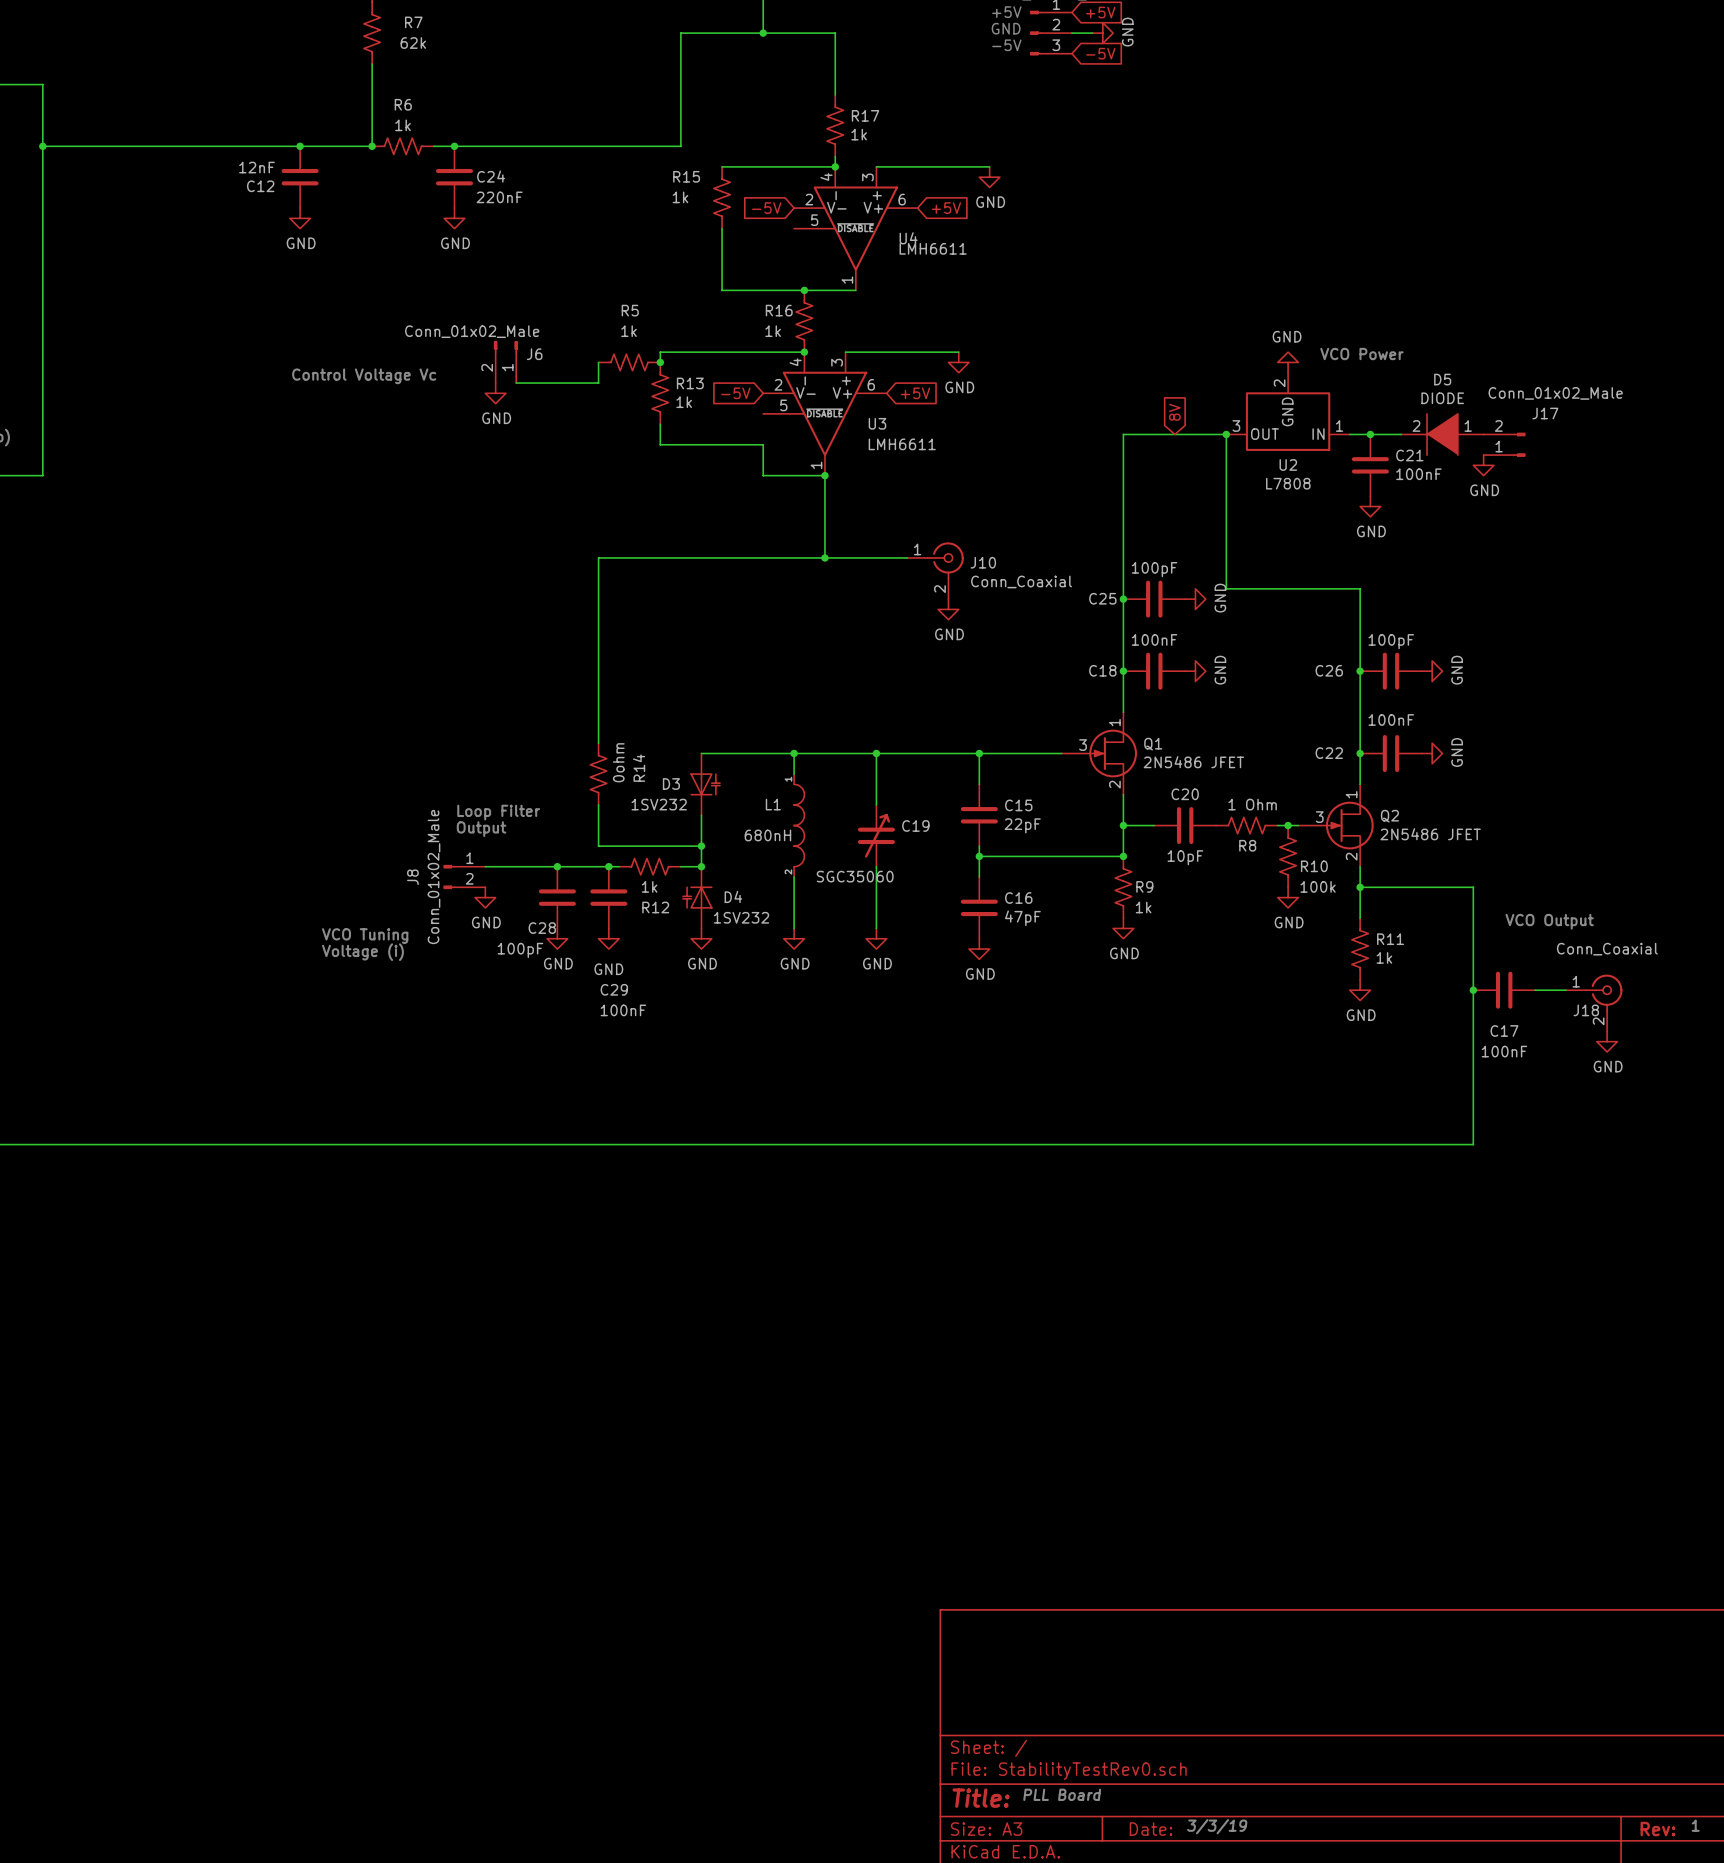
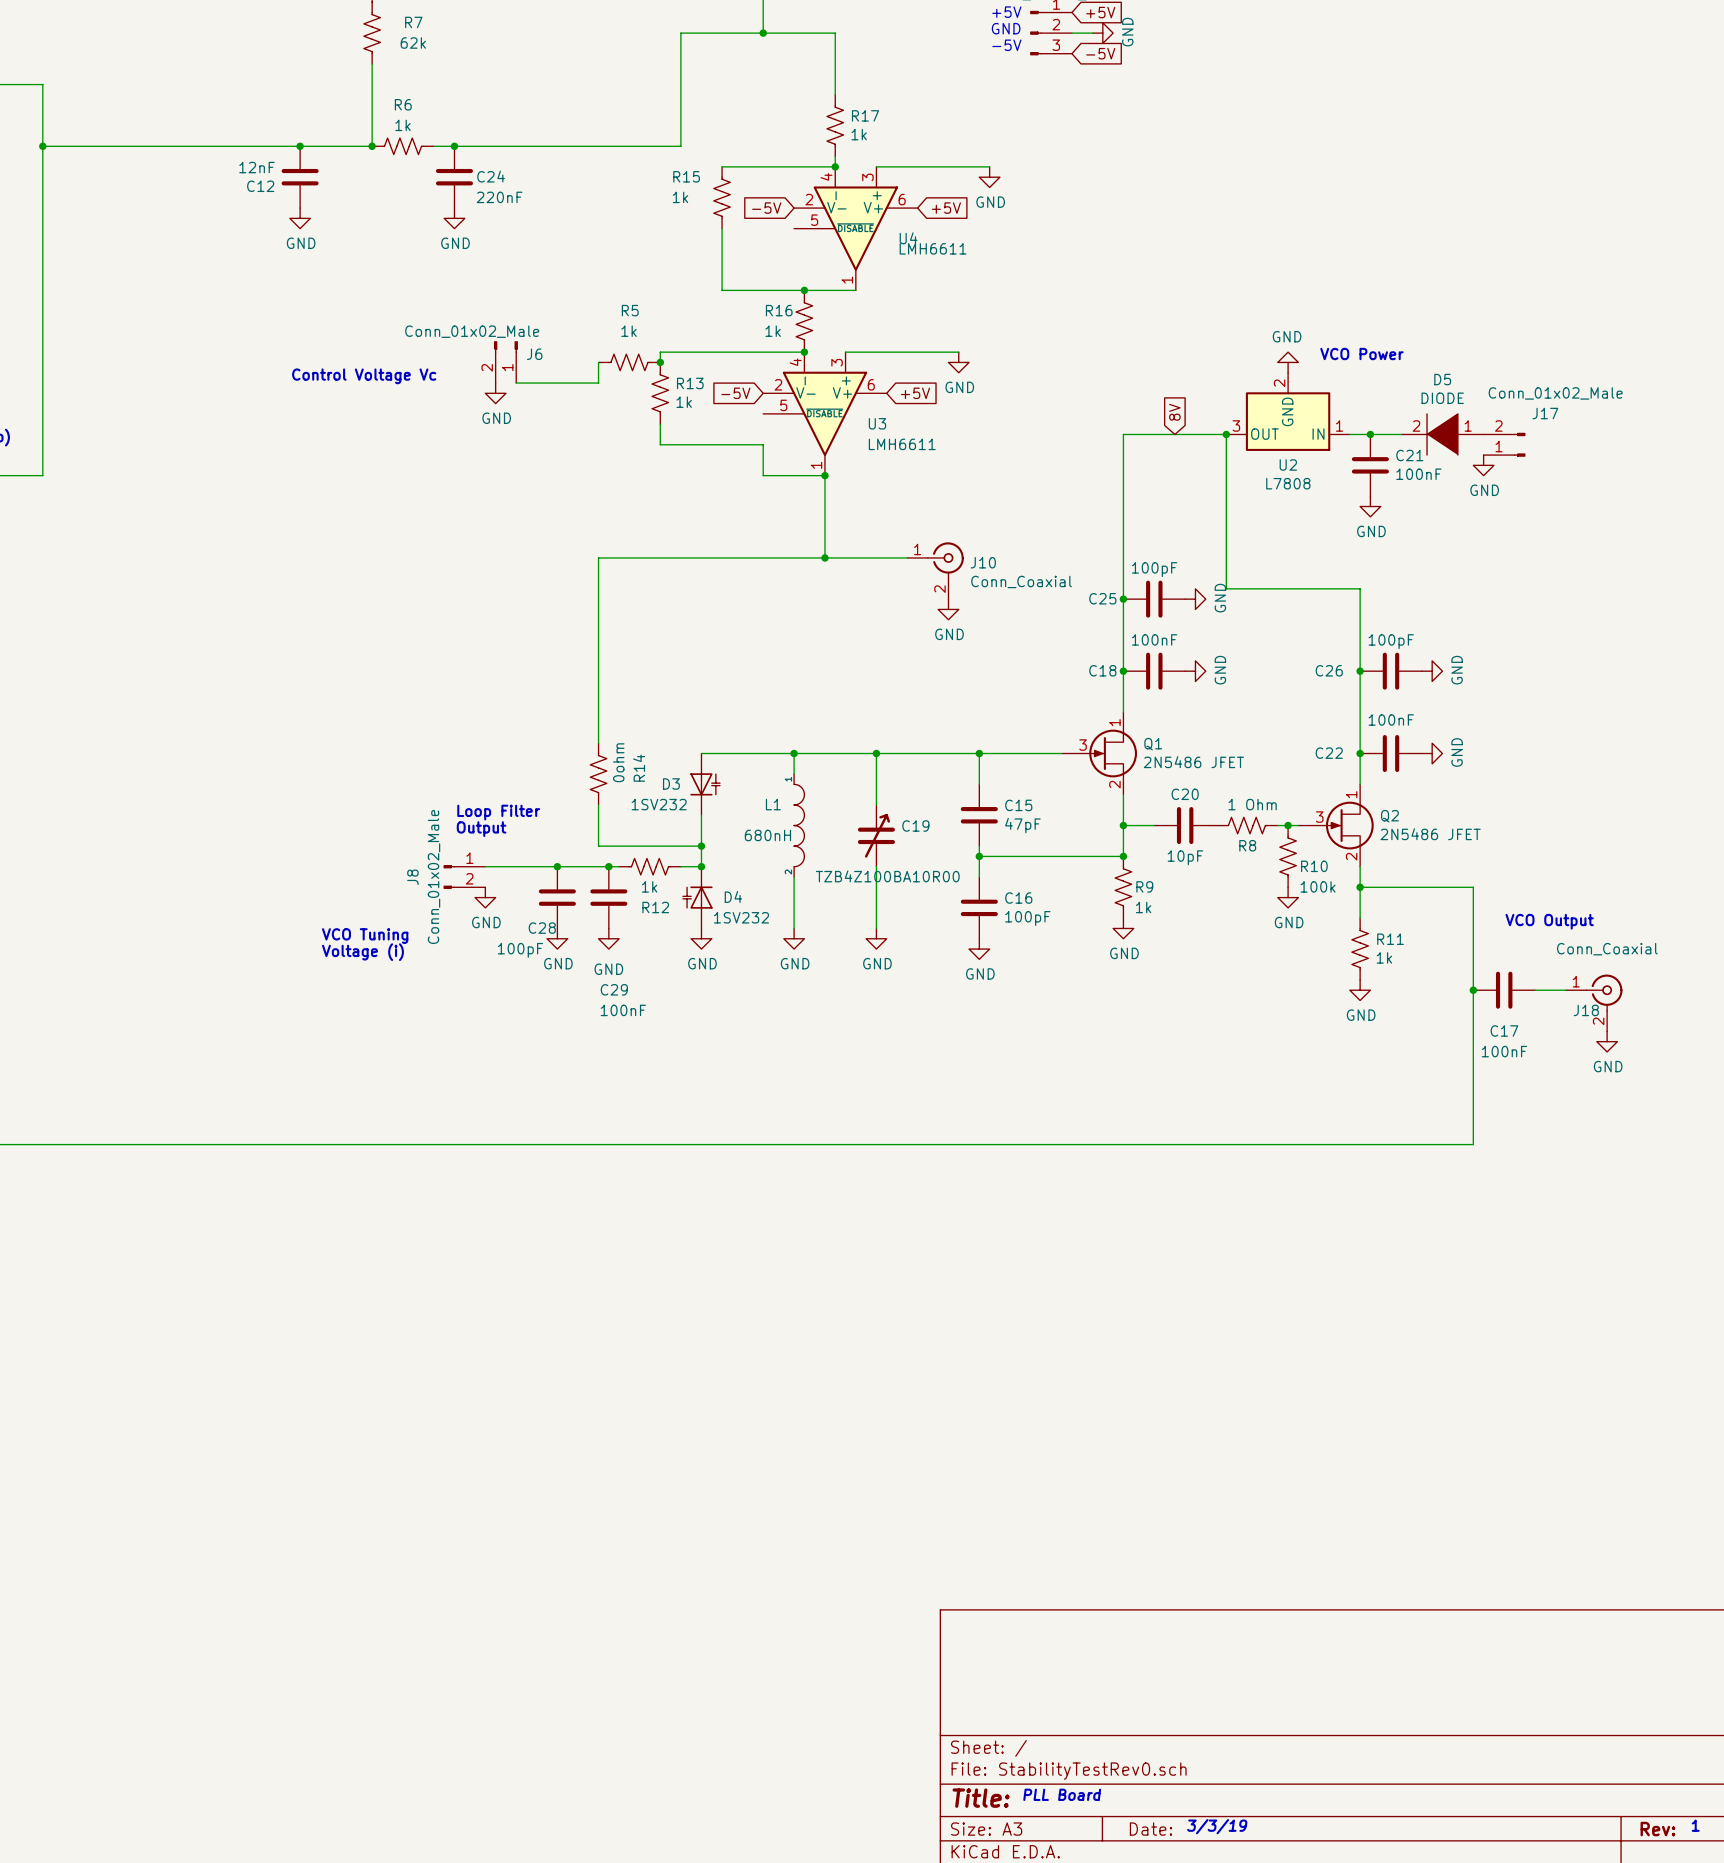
C15 value: 22pF (1022, 825) -> 47pF (1022, 825)
C19 value: SGC35060 (855, 876) -> TZB4Z100BA10R00 (887, 876)
C16 value: 47pF (1022, 918) -> 100pF (1027, 918)

